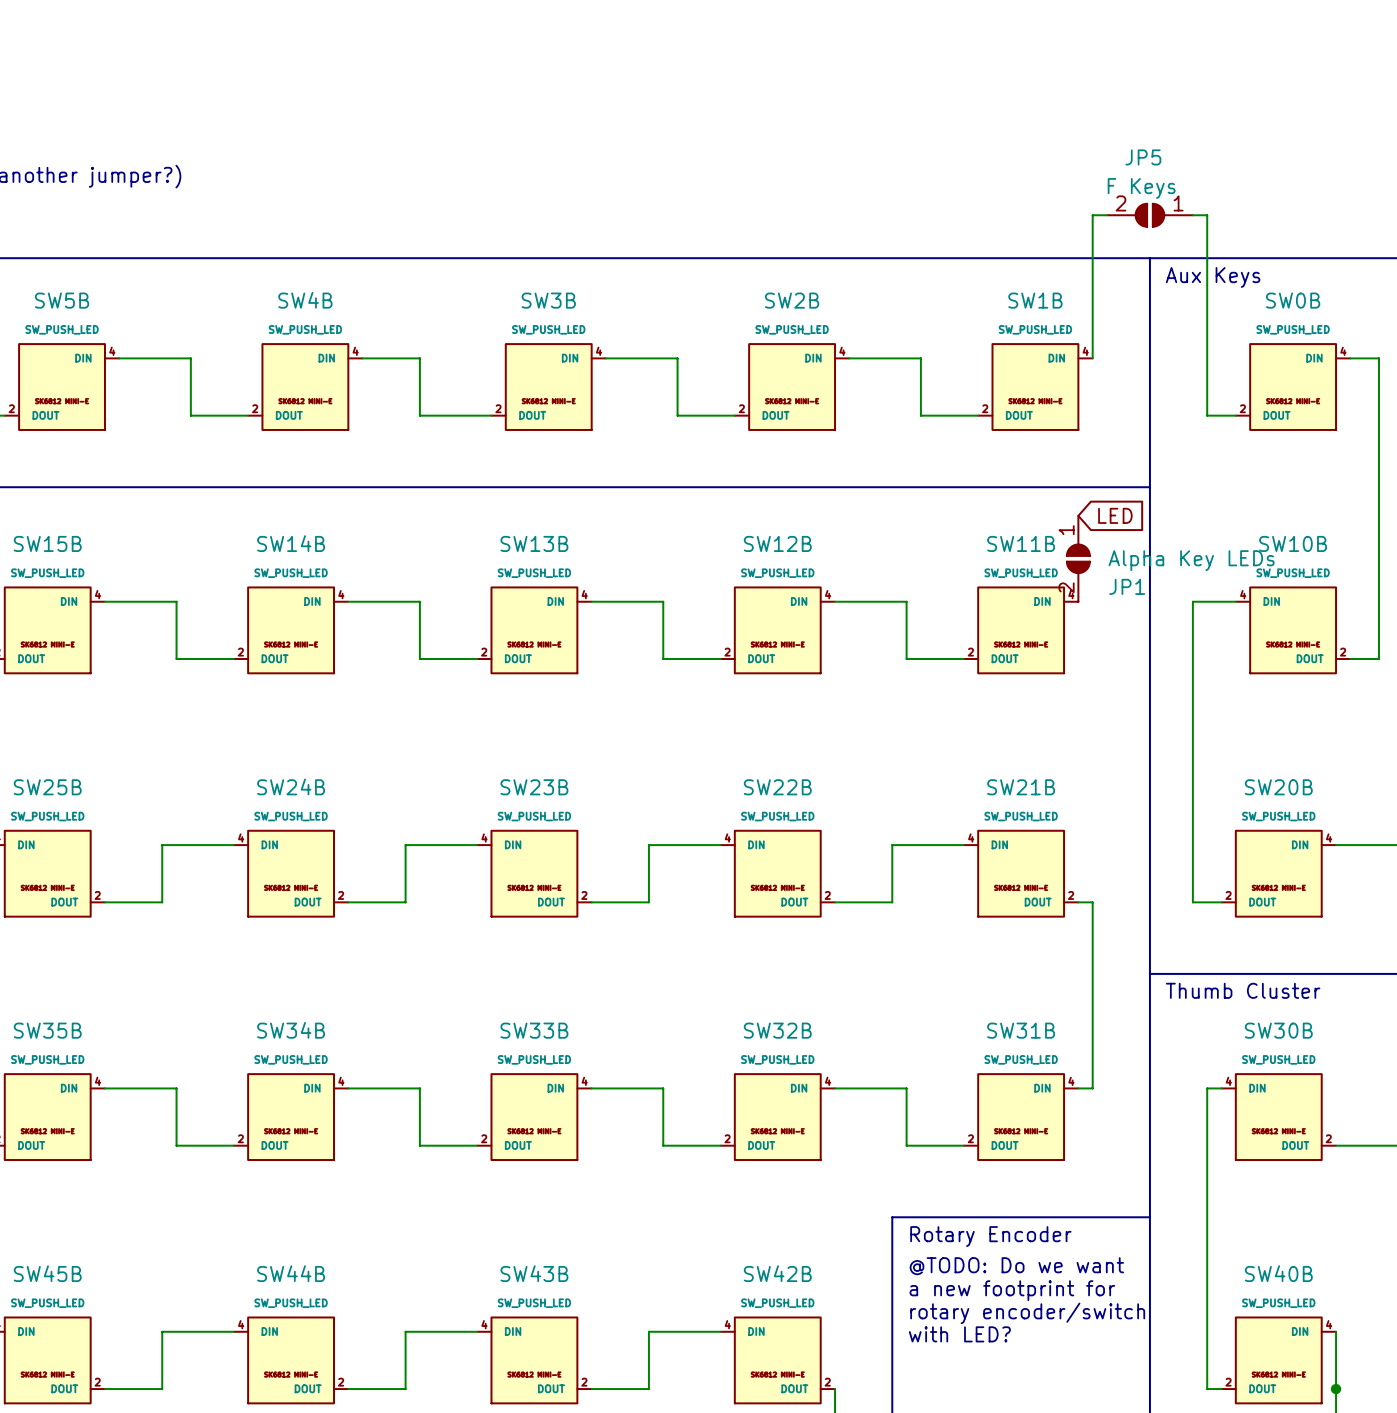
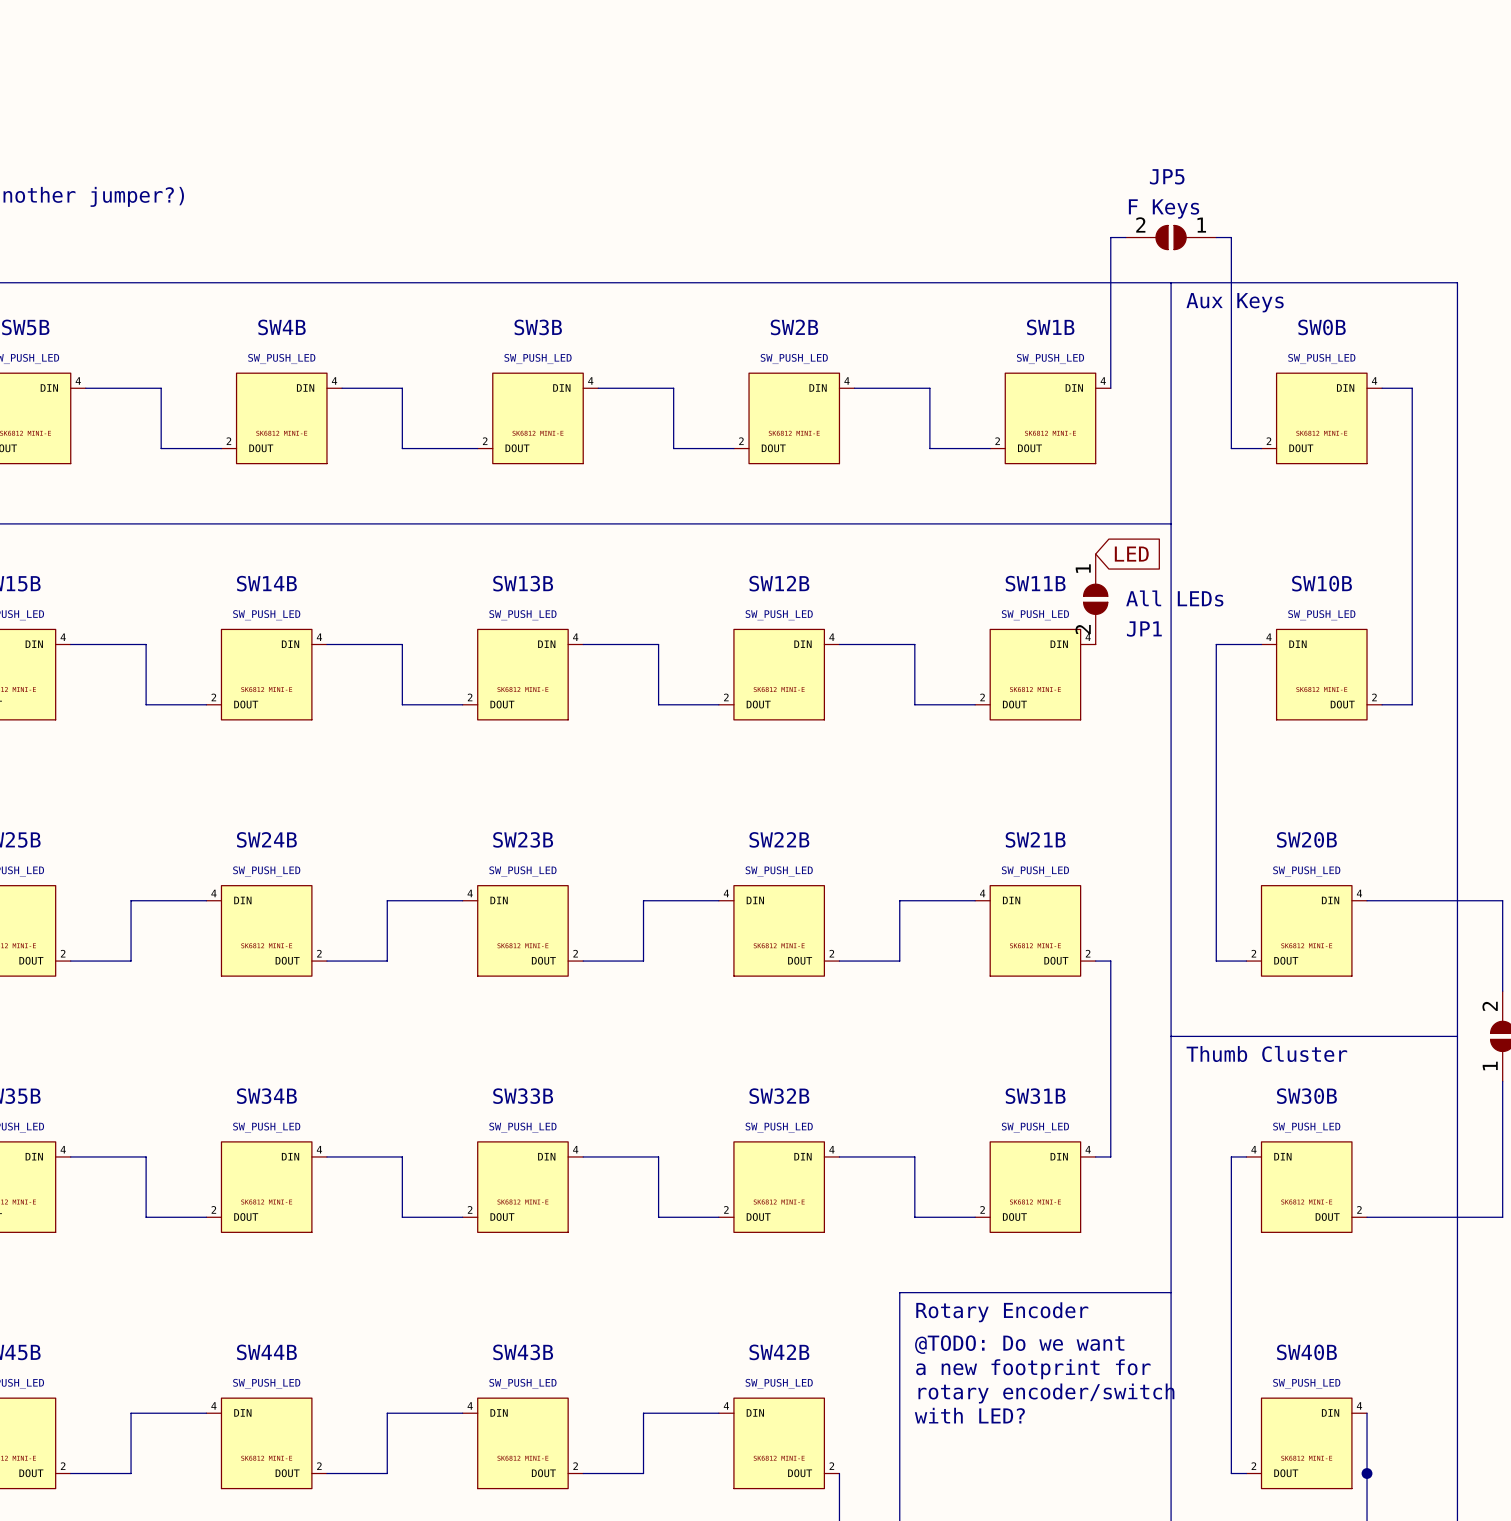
JP1 value: Alpha Key LEDs (1191, 560) -> All LEDs (1174, 598)

